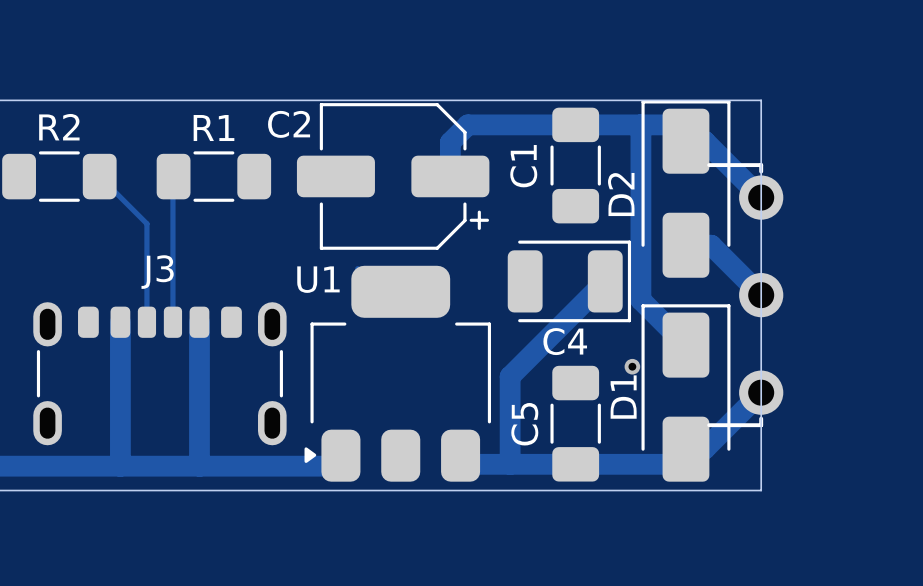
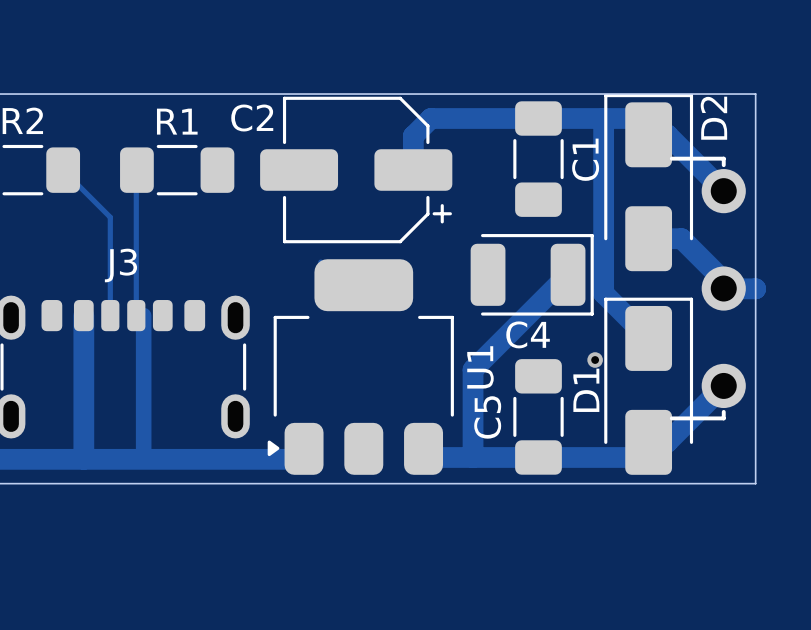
board edge: (761, 100) (761, 490) -> (723, 94) (755, 94) (755, 483) (723, 483)
C1 name position: C1 (523, 166) -> C1 (585, 159)
D2 name position: D2 (621, 194) -> D2 (713, 118)
track: (711, 245) (761, 295) -> (673, 238) (681, 238) (731, 288) (755, 288)
U1 name rotation: 0° (318, 279) -> 90° counterclockwise (480, 367)
U1 name position: U1 (318, 279) -> U1 (480, 367)
track: none -> (143, 315) (143, 456)
track: (199, 322) (199, 466) -> none

